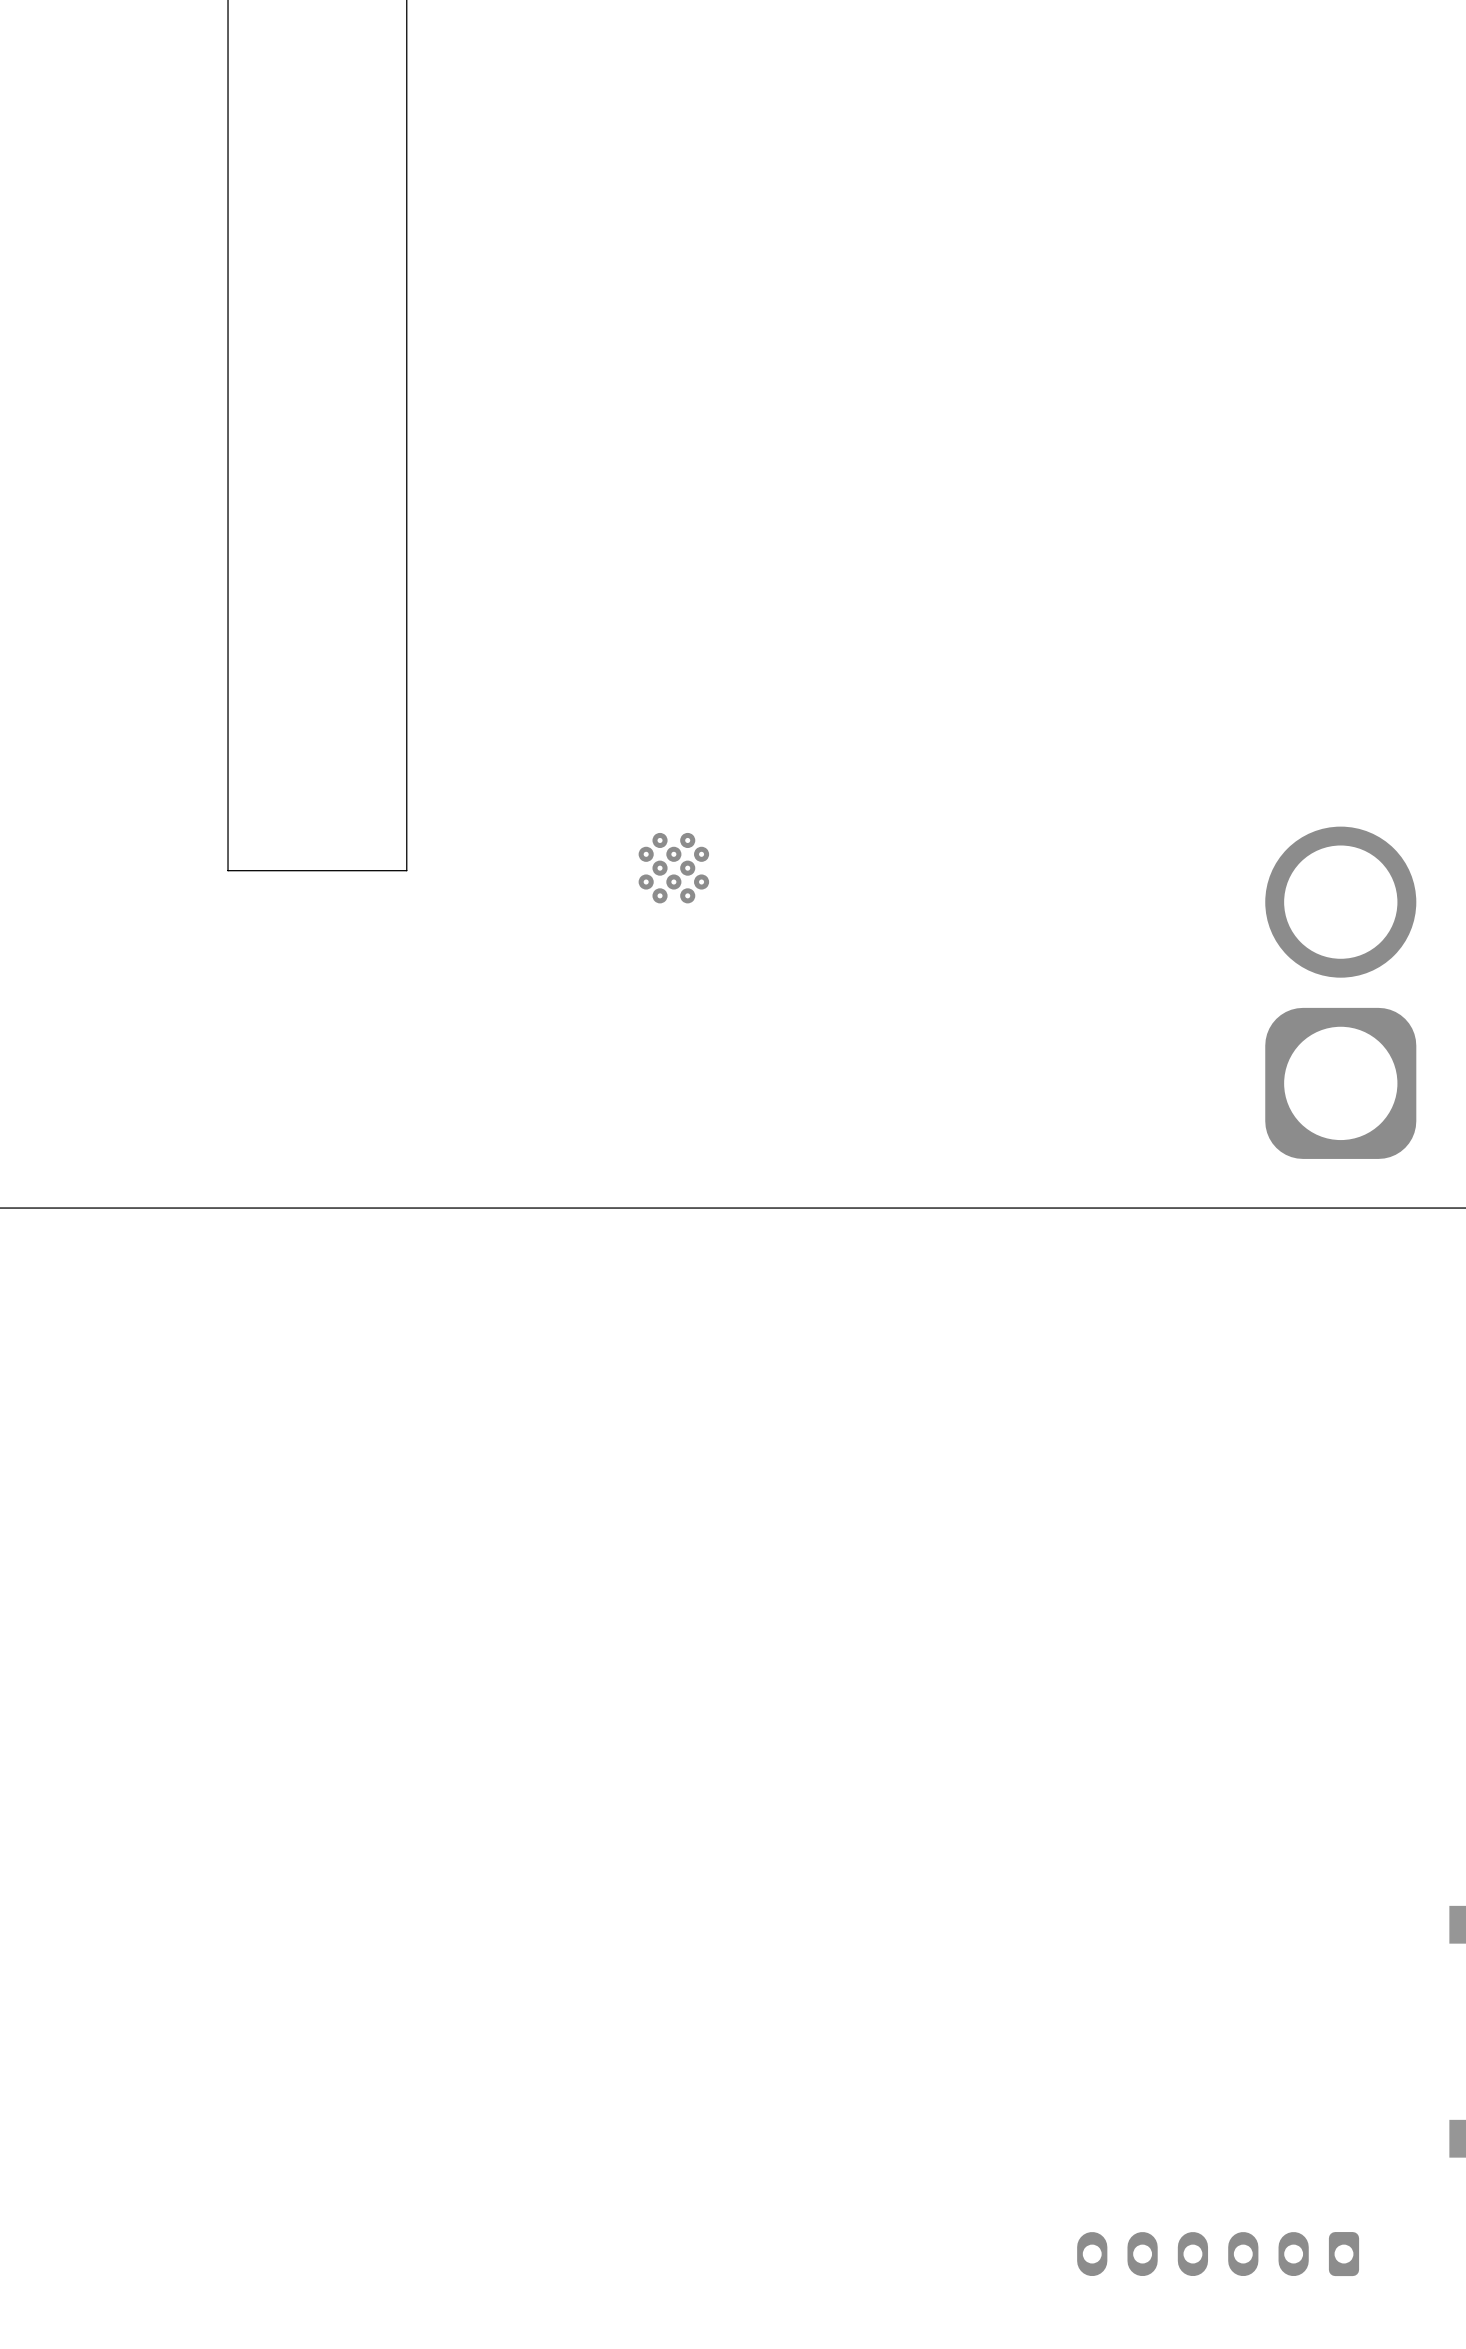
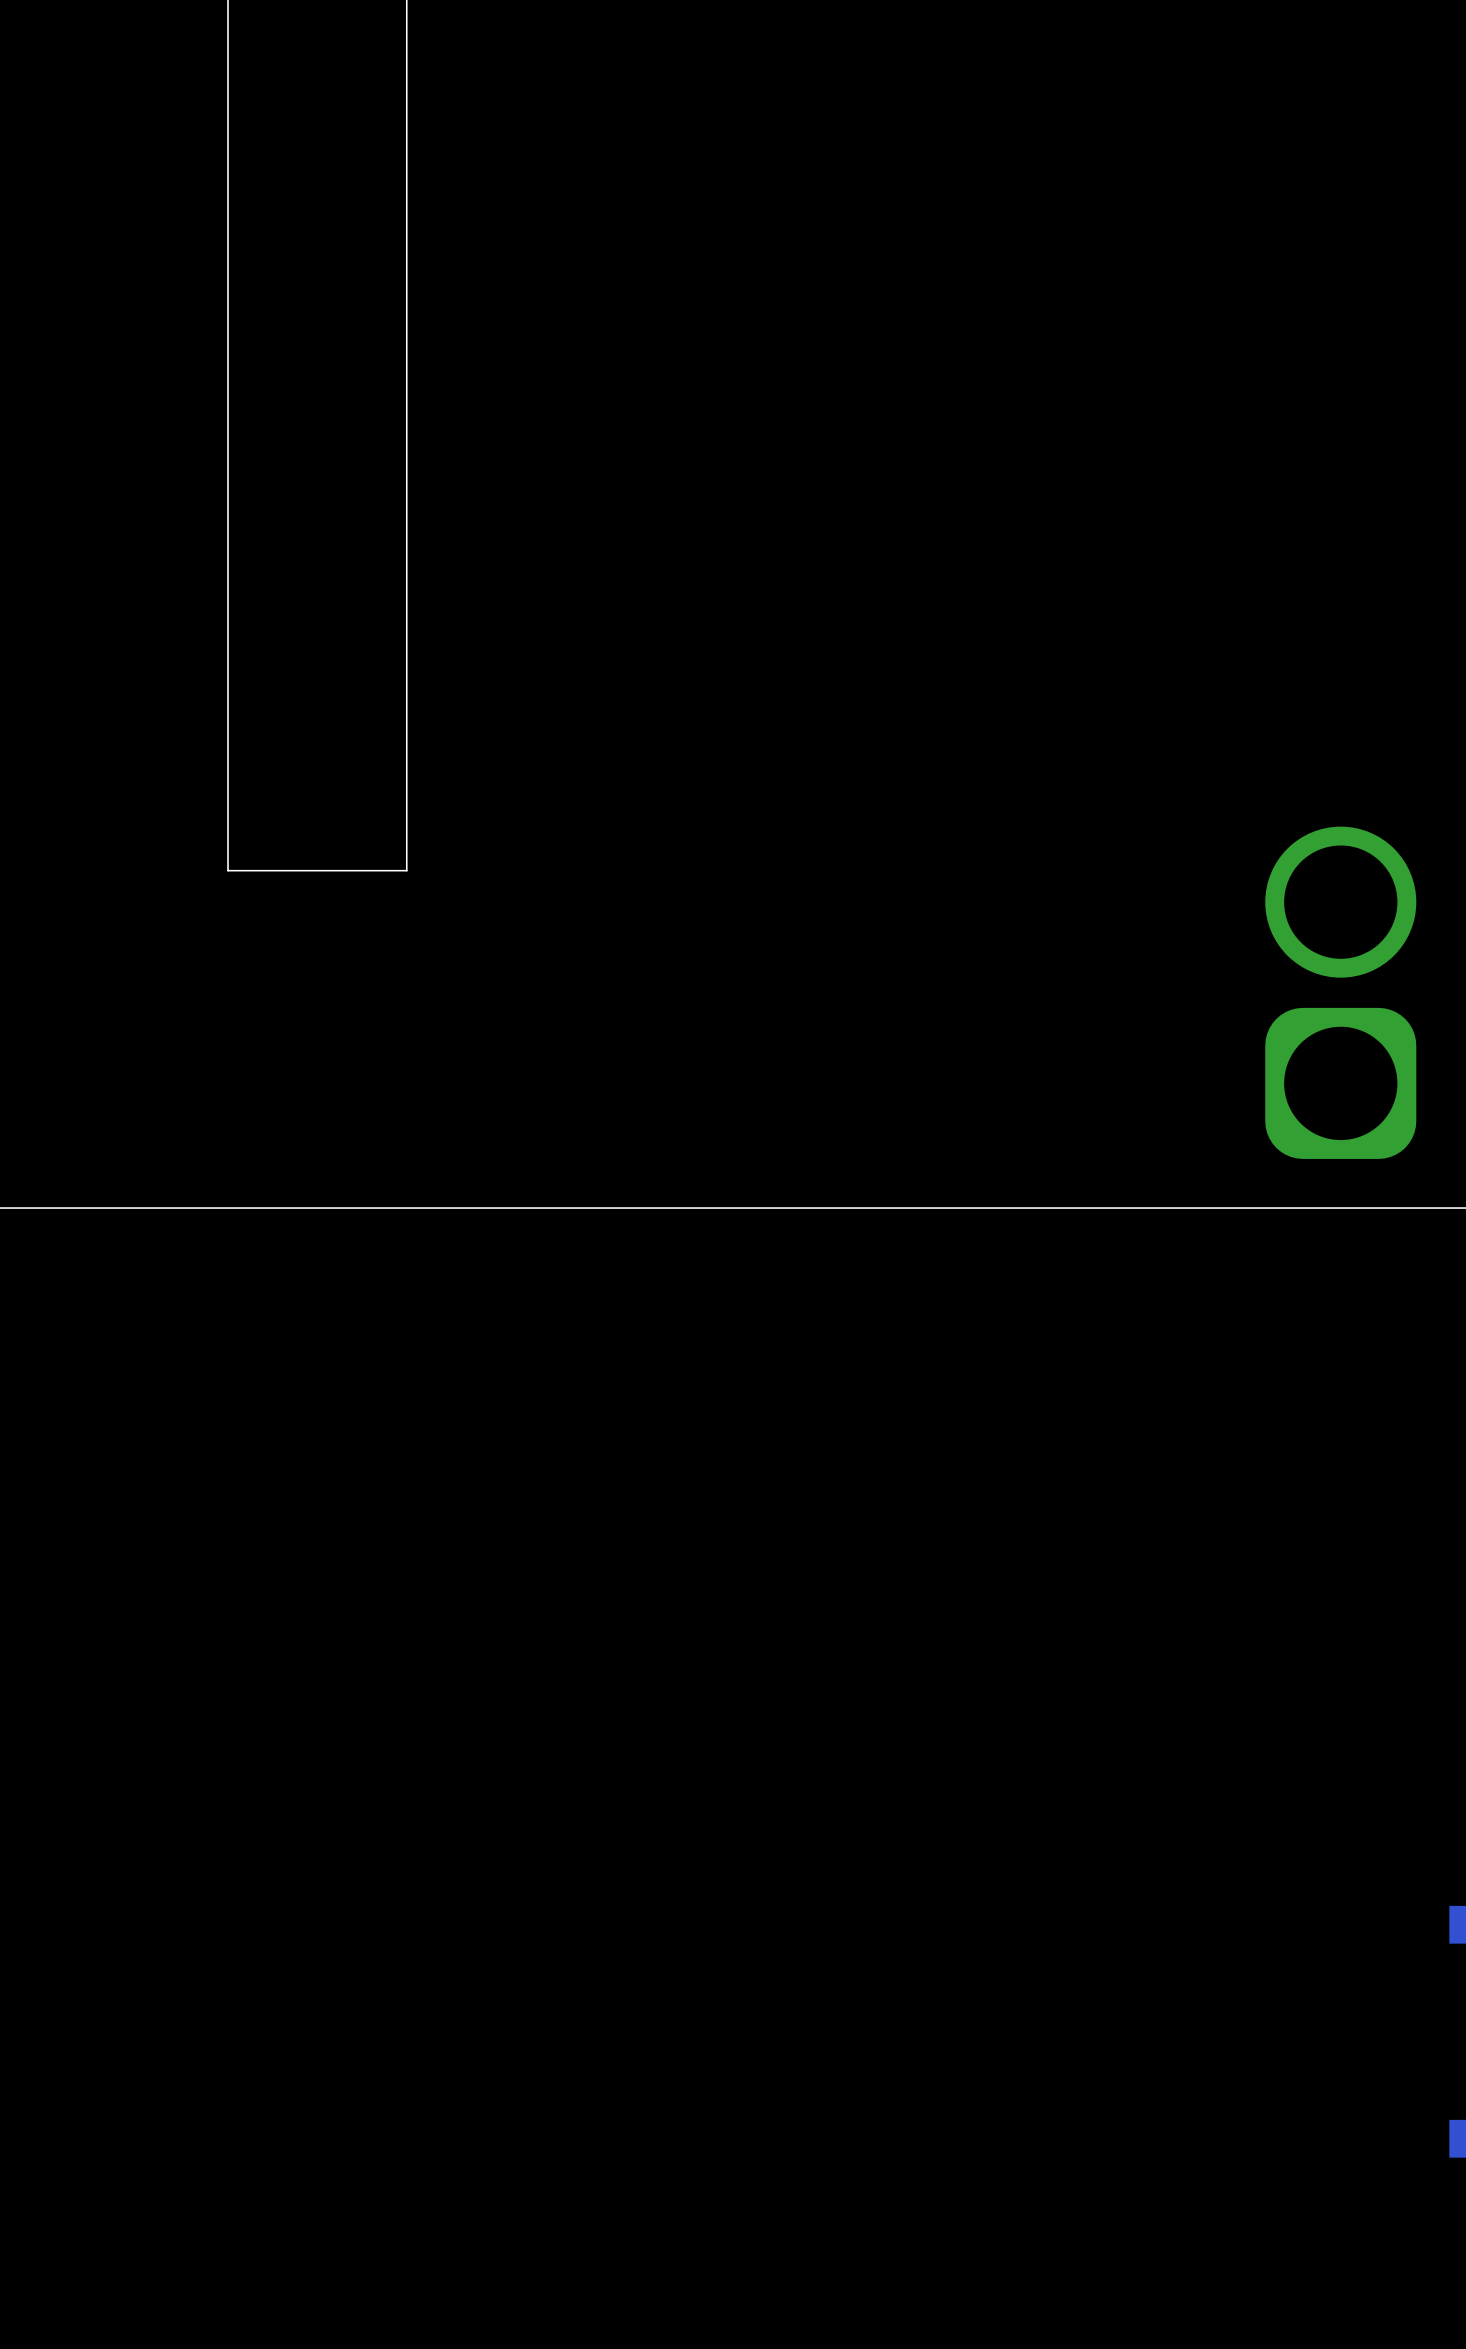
part: (673, 868) -> none
part: (1218, 2254) -> none

